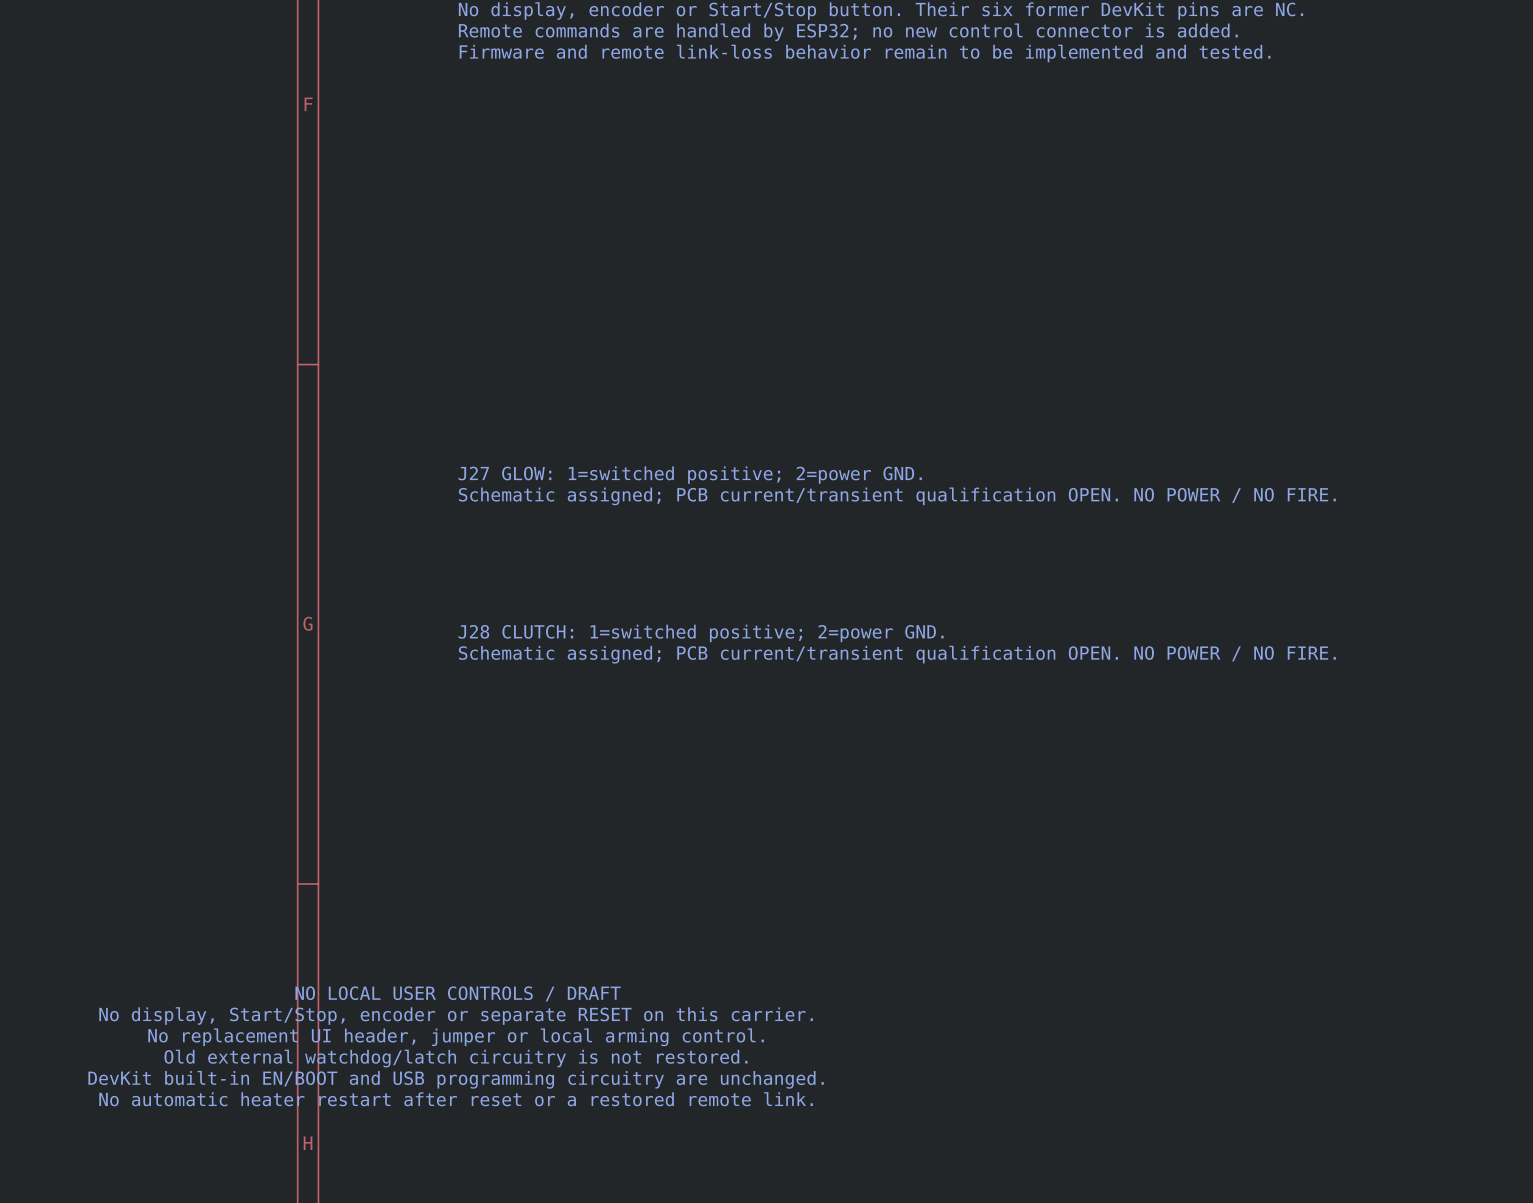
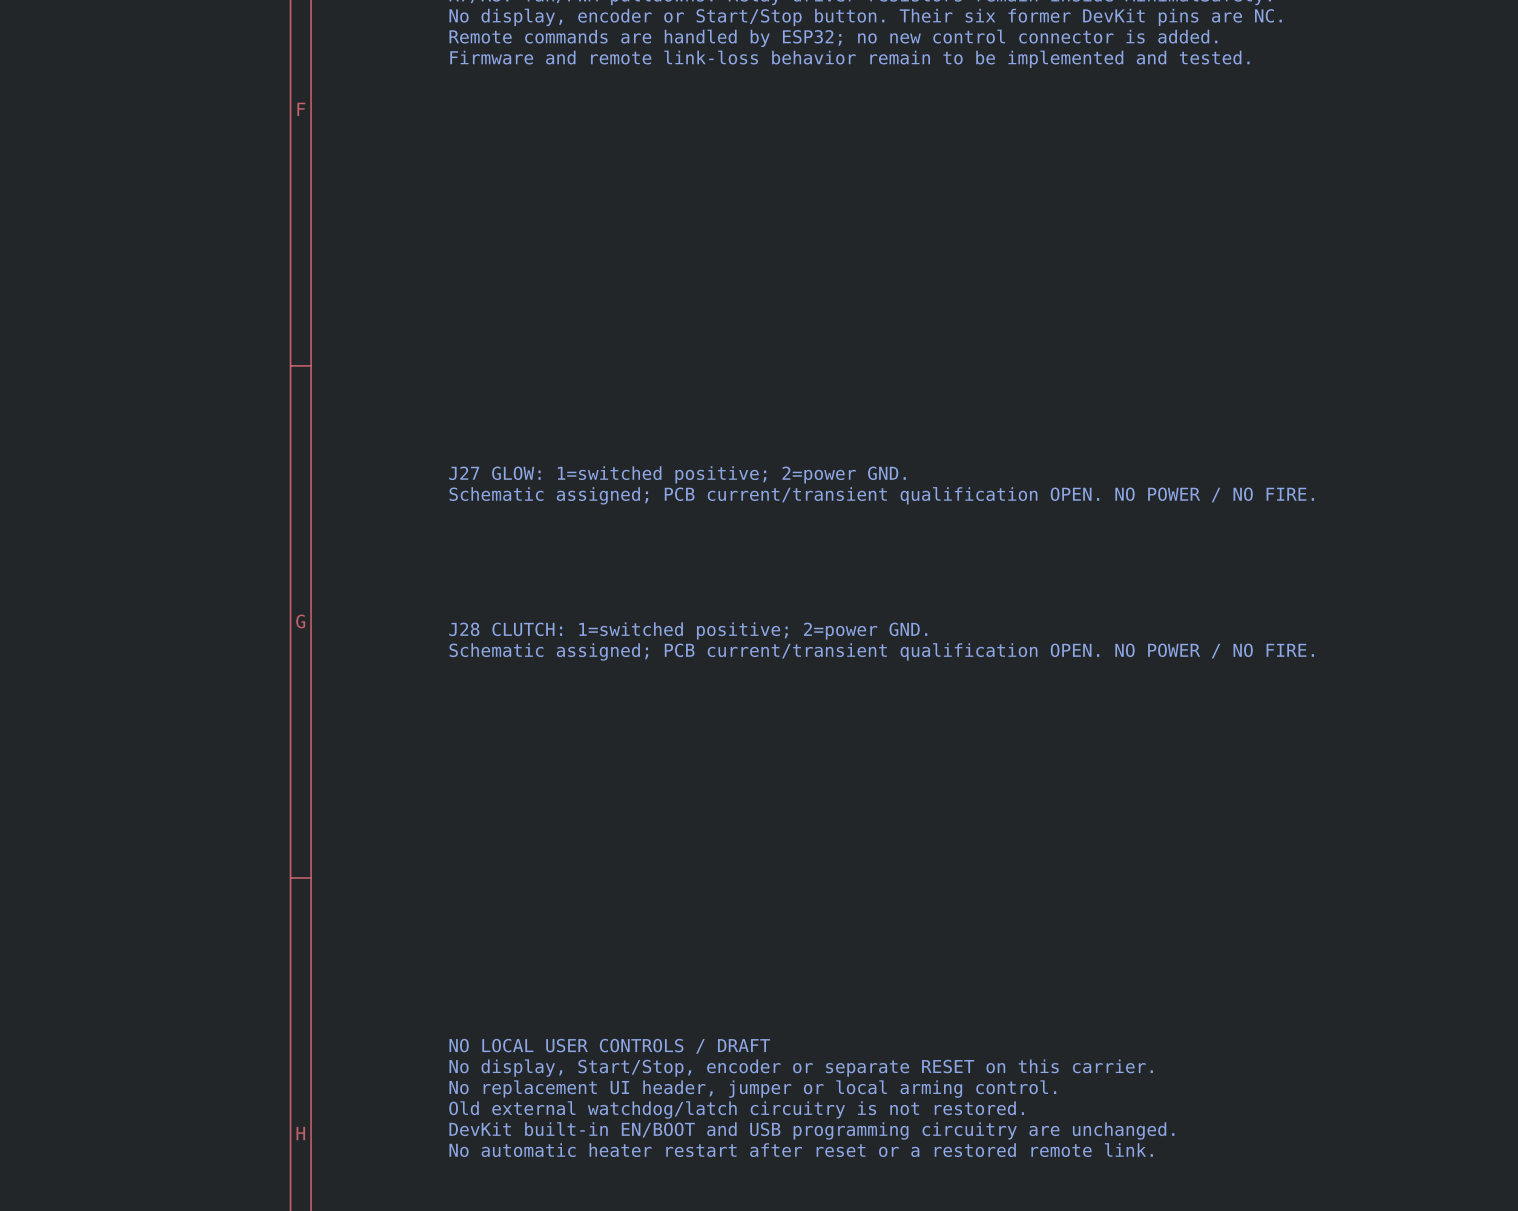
text position: NO LOCAL USER CONTROLS / DRAFT (458, 993) -> NO LOCAL USER CONTROLS / DRAFT (609, 1046)
text position: No display, Start/Stop, encoder or separate RESET on this carrier. (456, 1016) -> No display, Start/Stop, encoder or separate RESET on this carrier. (801, 1068)
text position: No replacement UI header, jumper or local arming control. (456, 1037) -> No replacement UI header, jumper or local arming control. (752, 1089)
text position: Old external watchdog/latch circuitry is not restored. (455, 1058) -> Old external watchdog/latch circuitry is not restored. (736, 1109)
text position: DevKit built-in EN/BOOT and USB programming circuitry are unchanged. (456, 1079) -> DevKit built-in EN/BOOT and USB programming circuitry are unchanged. (811, 1130)
text position: No automatic heater restart after reset or a restored remote link. (456, 1099) -> No automatic heater restart after reset or a restored remote link. (801, 1150)

